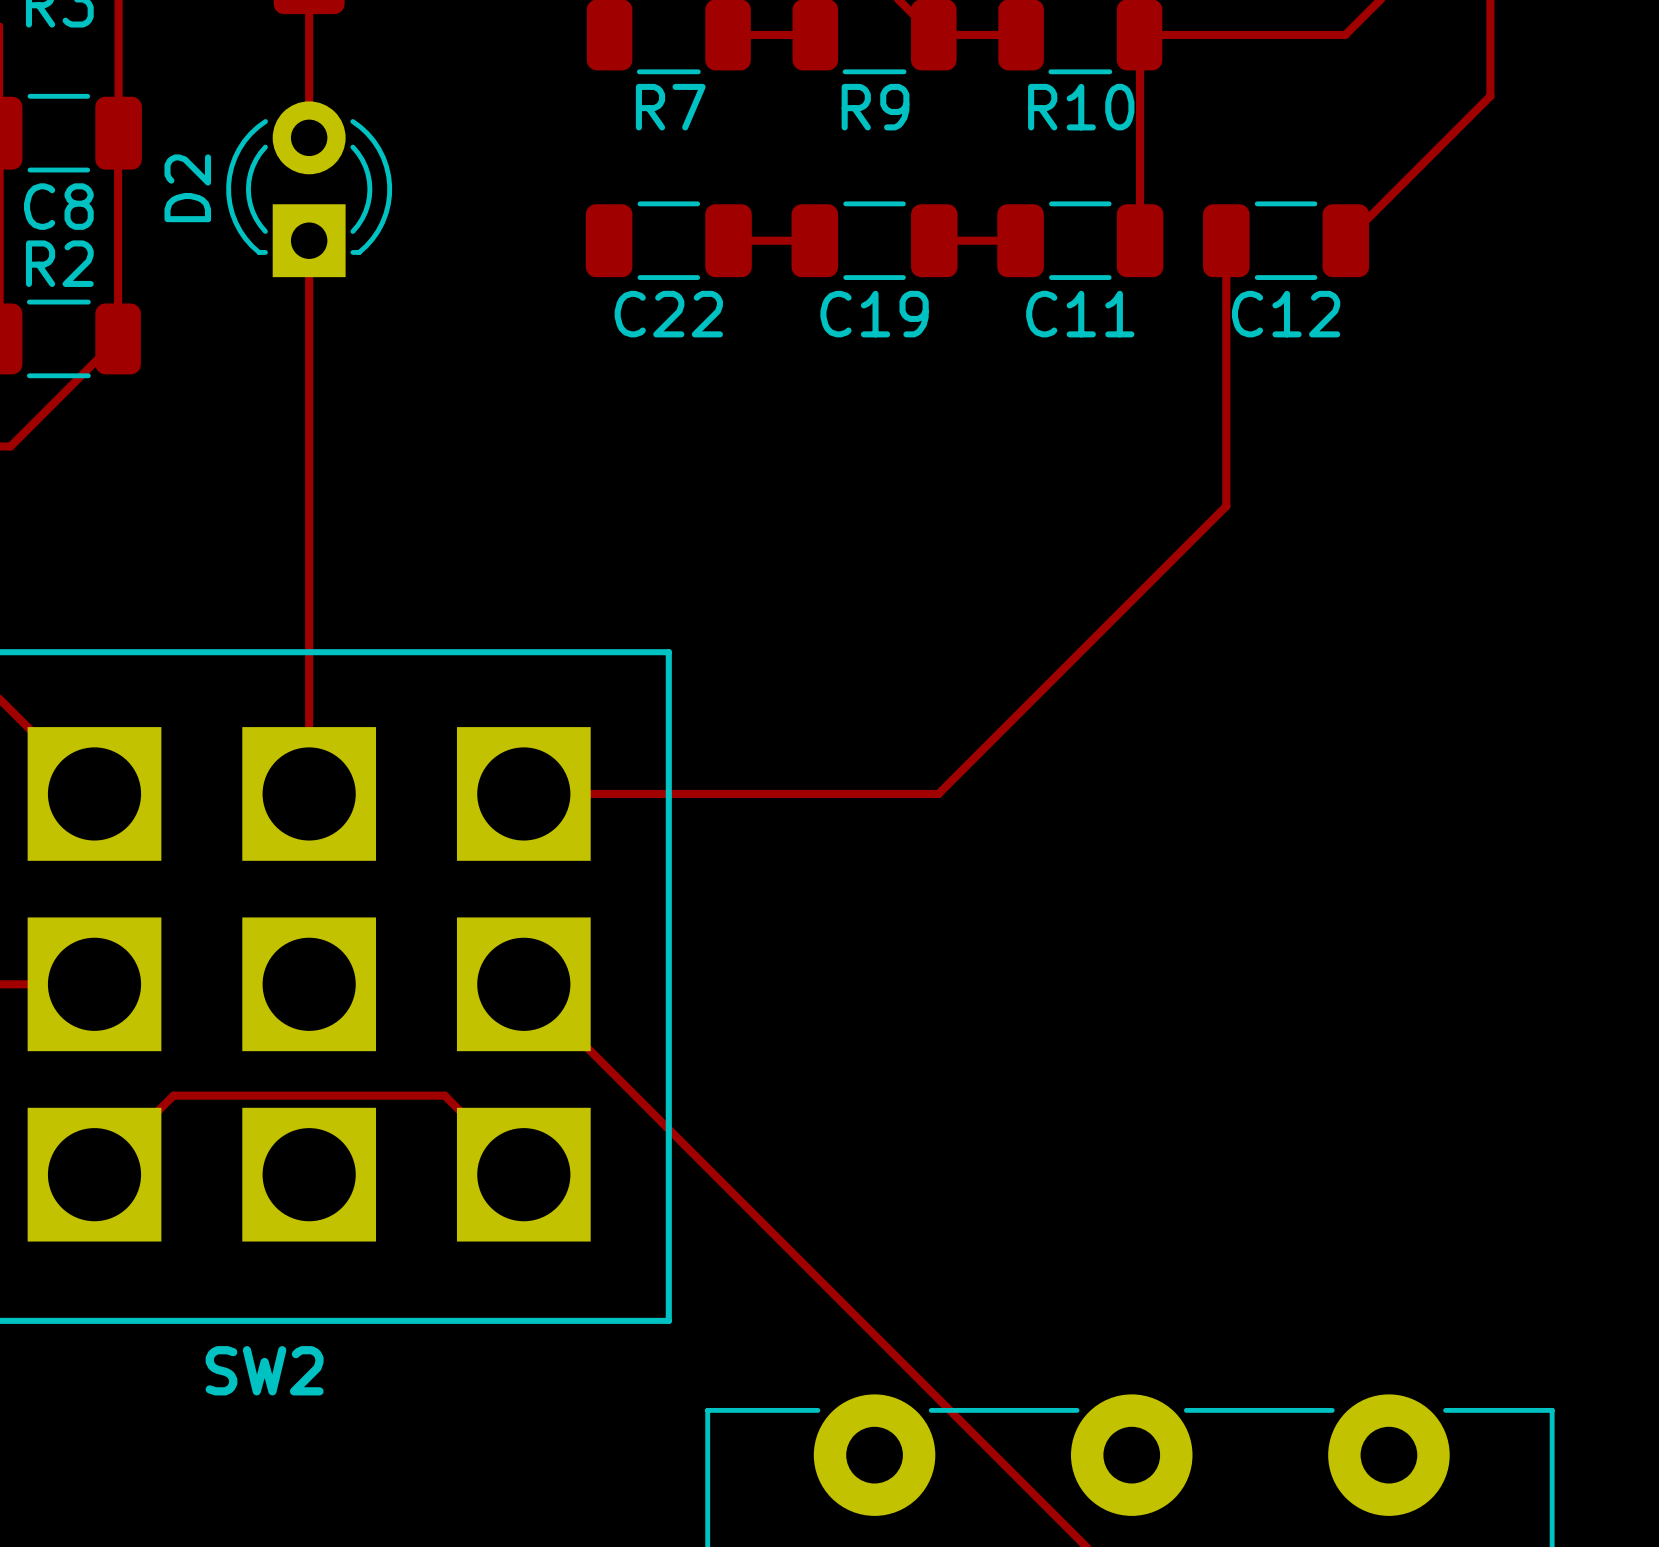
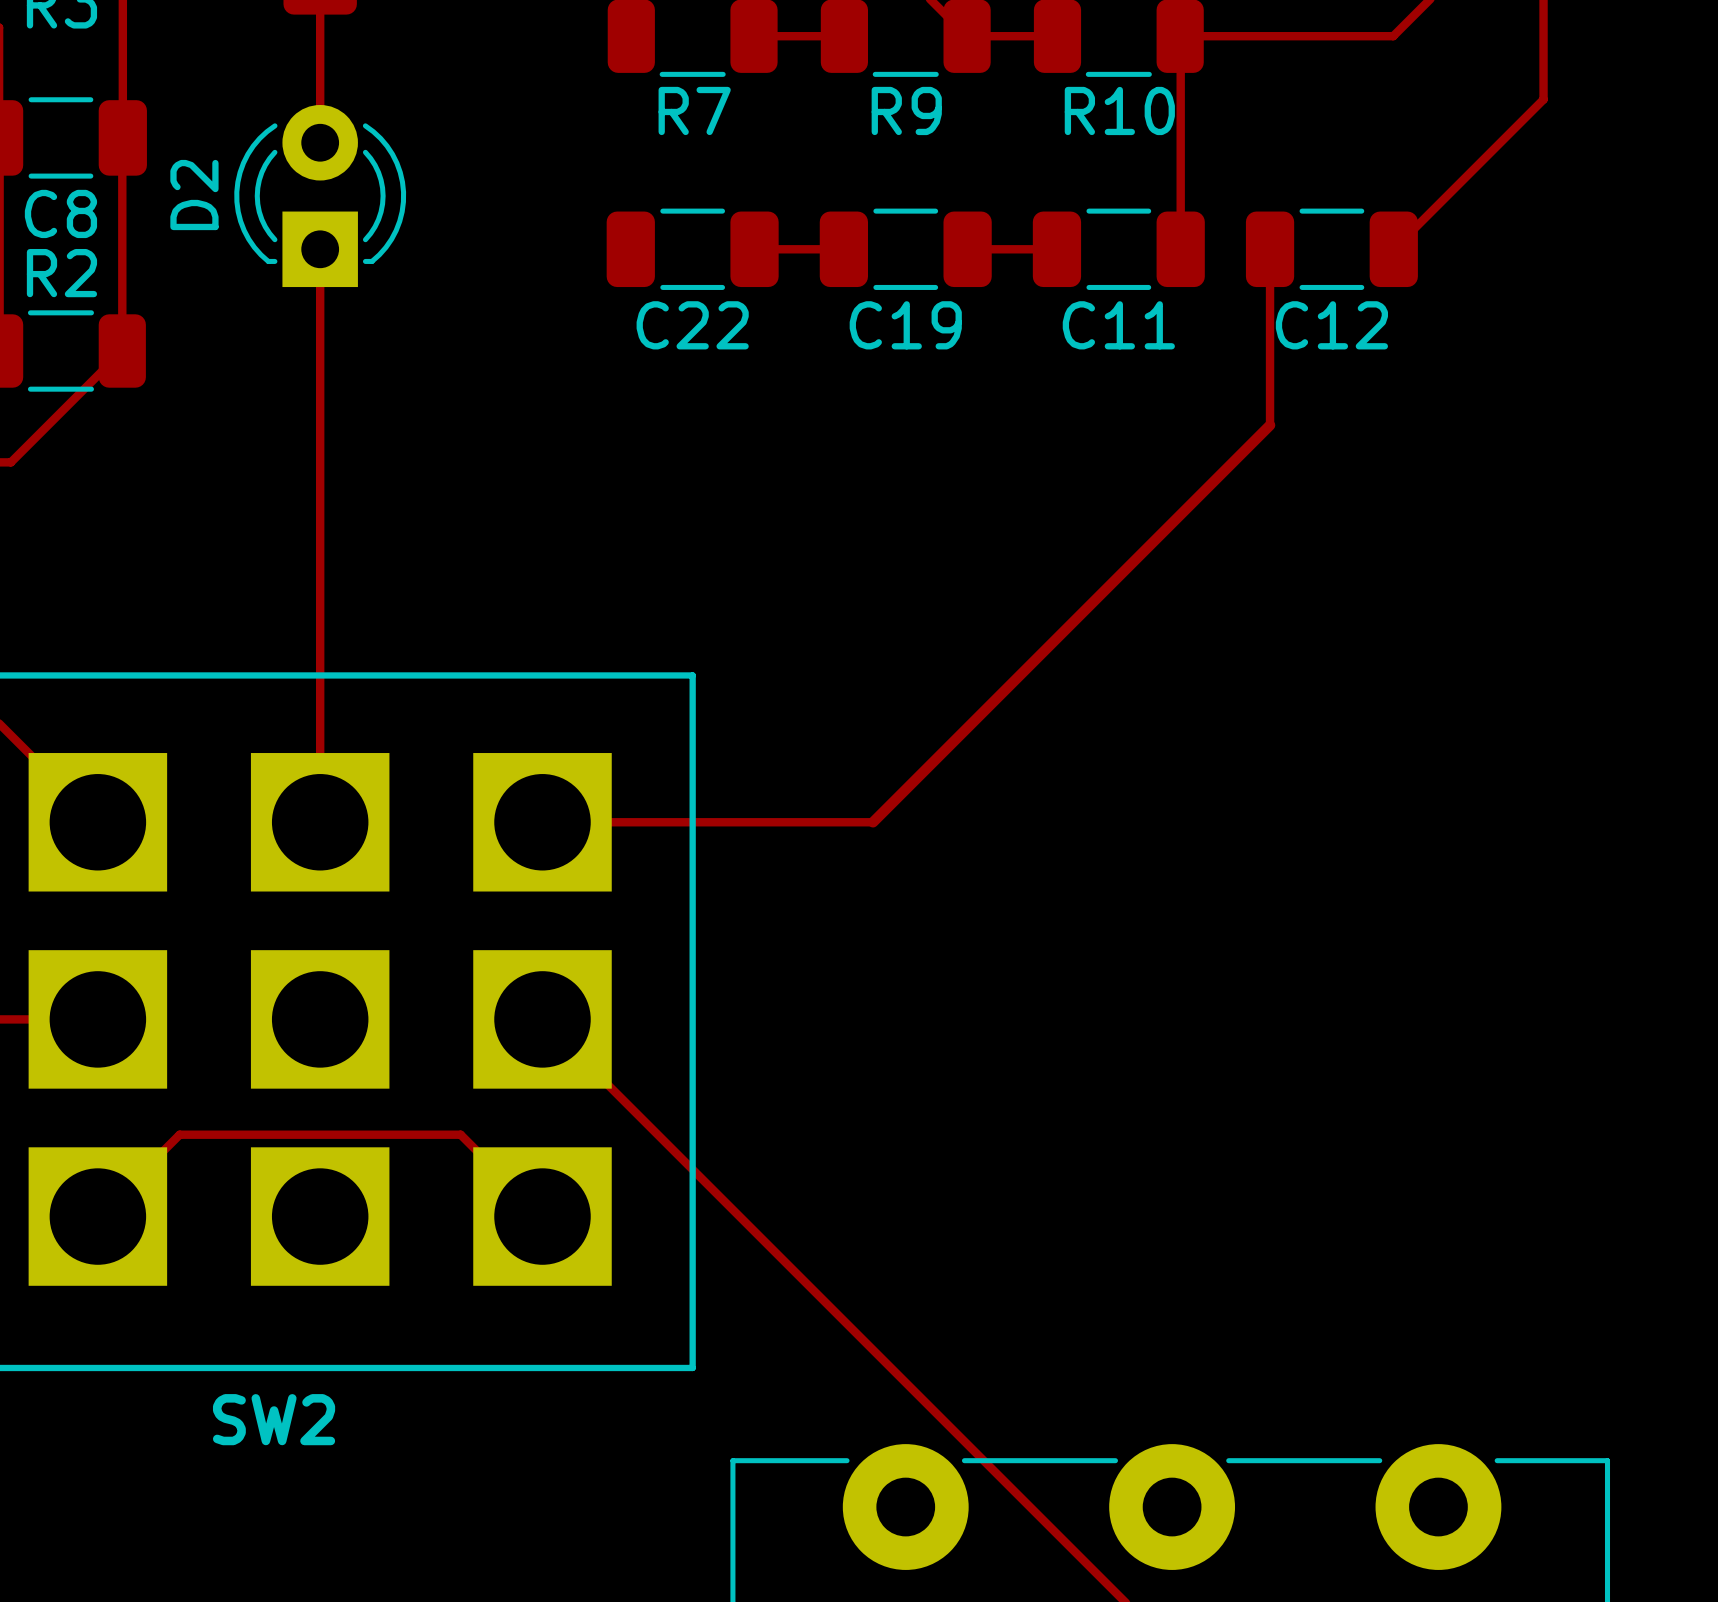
track: (1226, 410) (1226, 506) (938, 793) (842, 793) -> (1270, 425) (873, 822)

